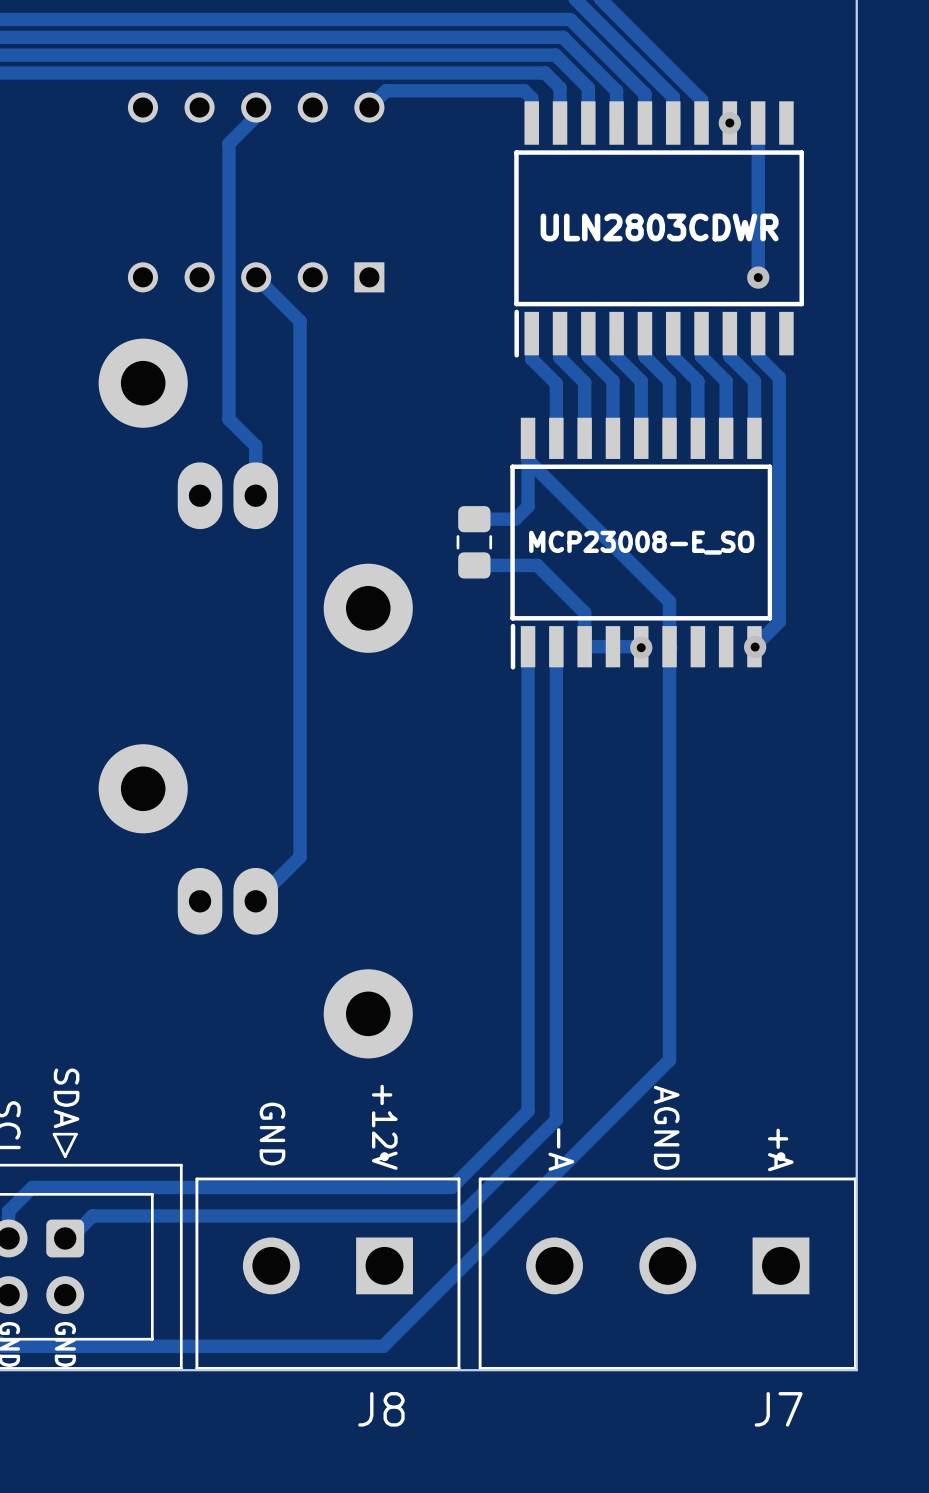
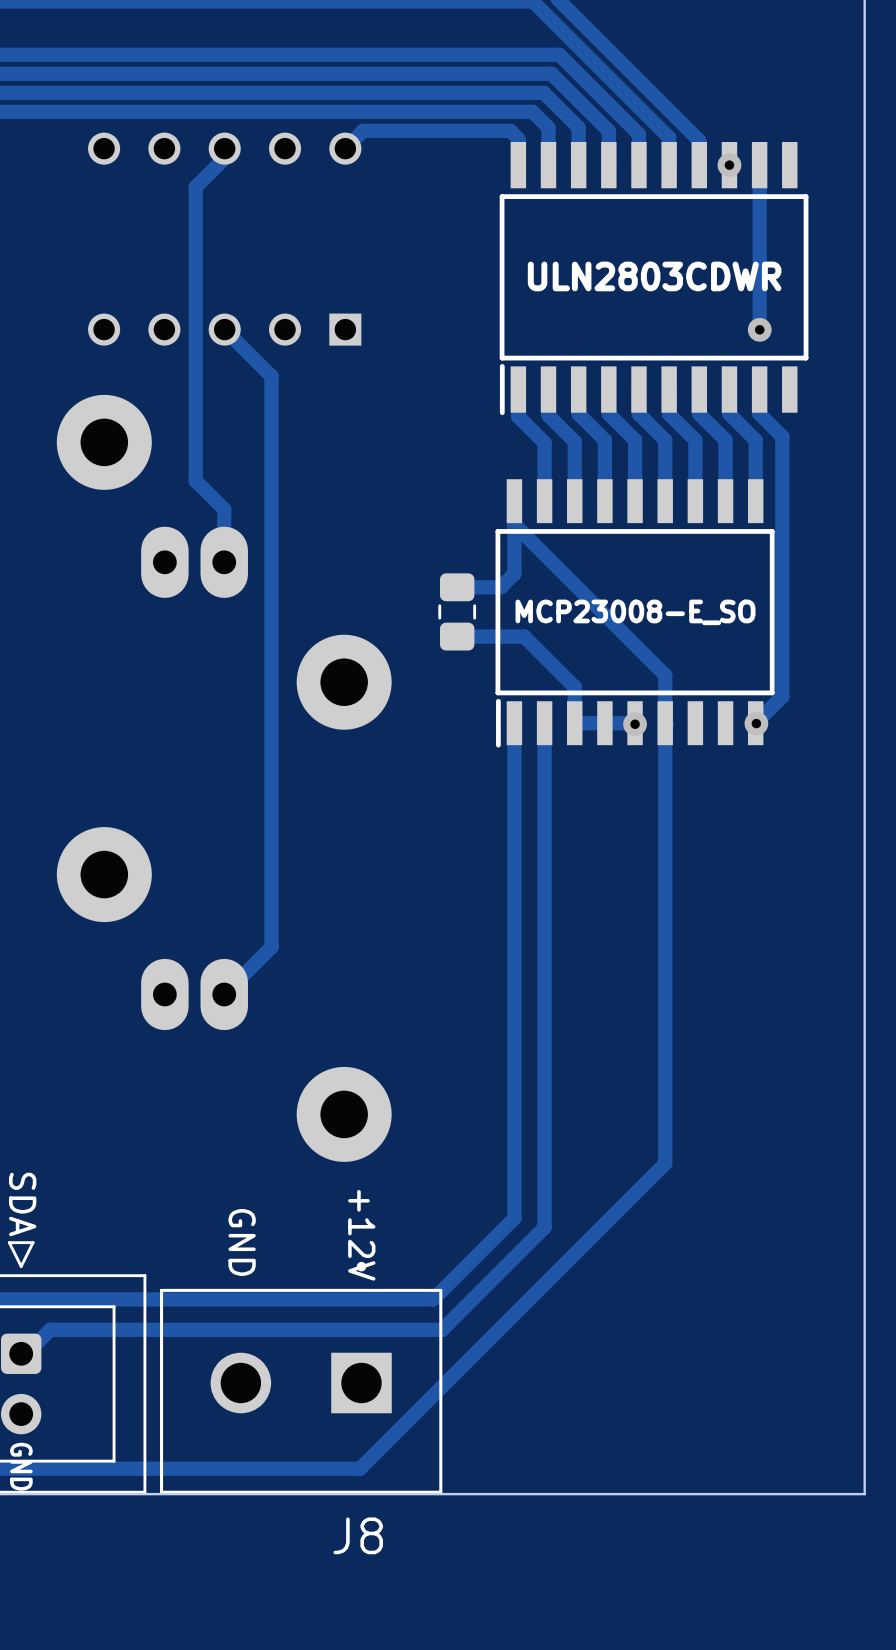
text: AGND (666, 1127) -> none
text: -A (561, 1149) -> none
text: +A (780, 1149) -> none
J7: (667, 1261) -> none

